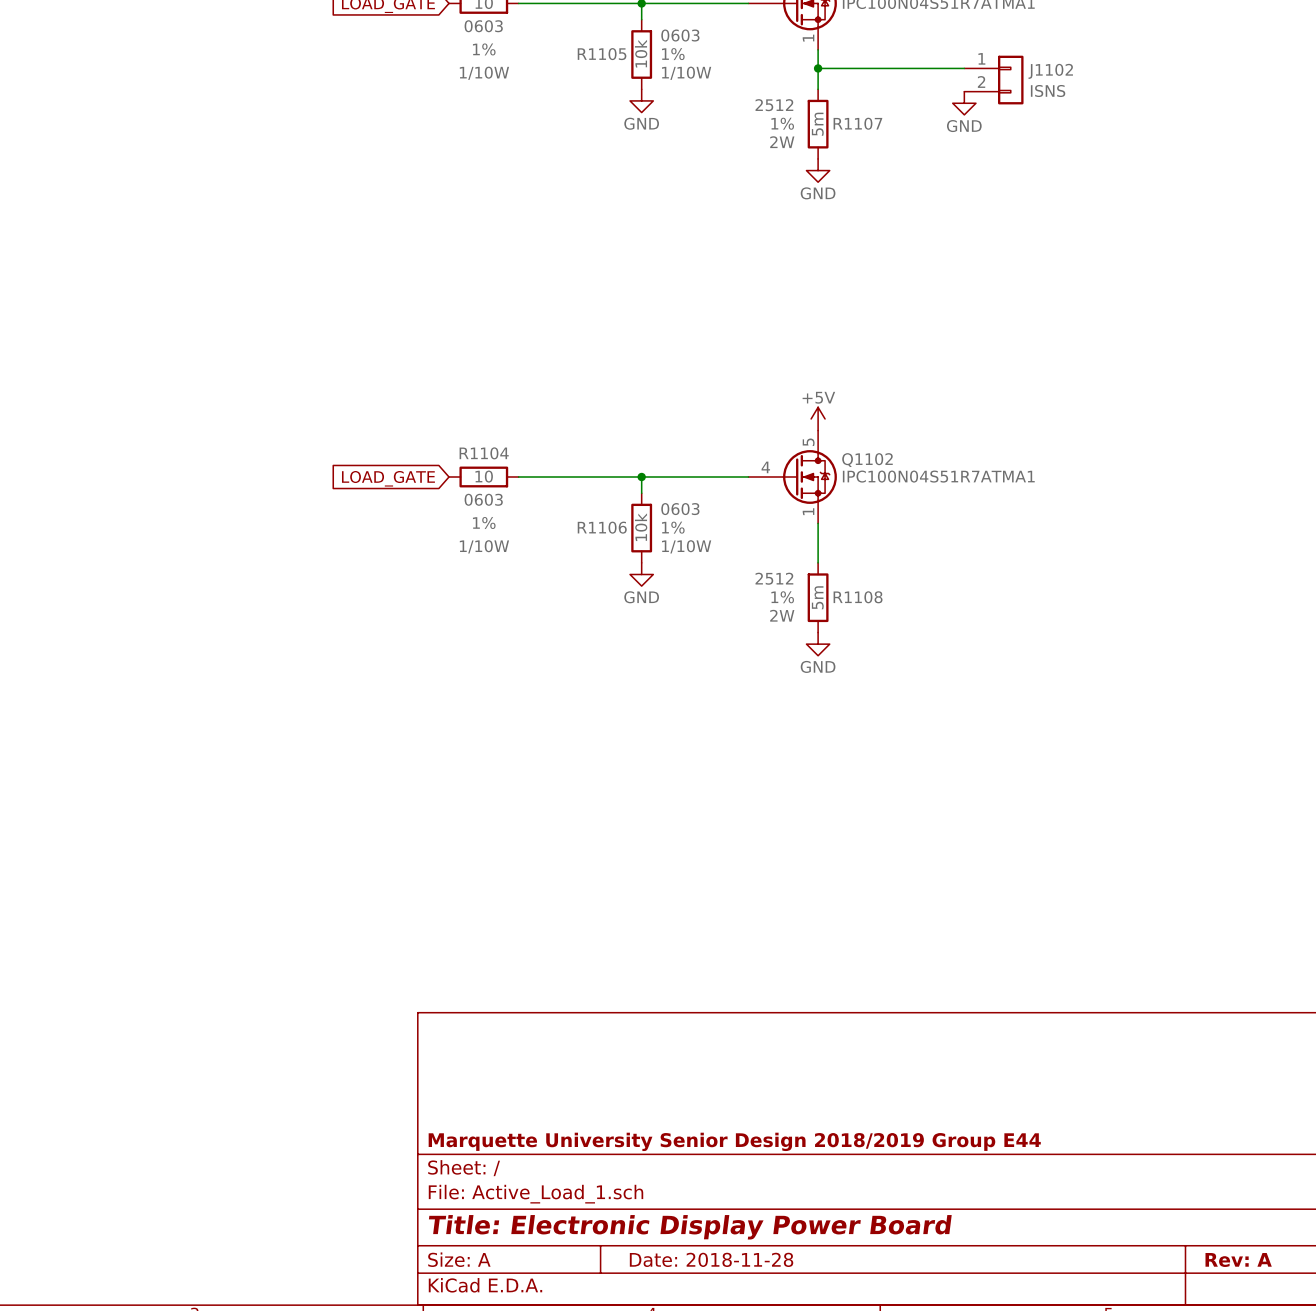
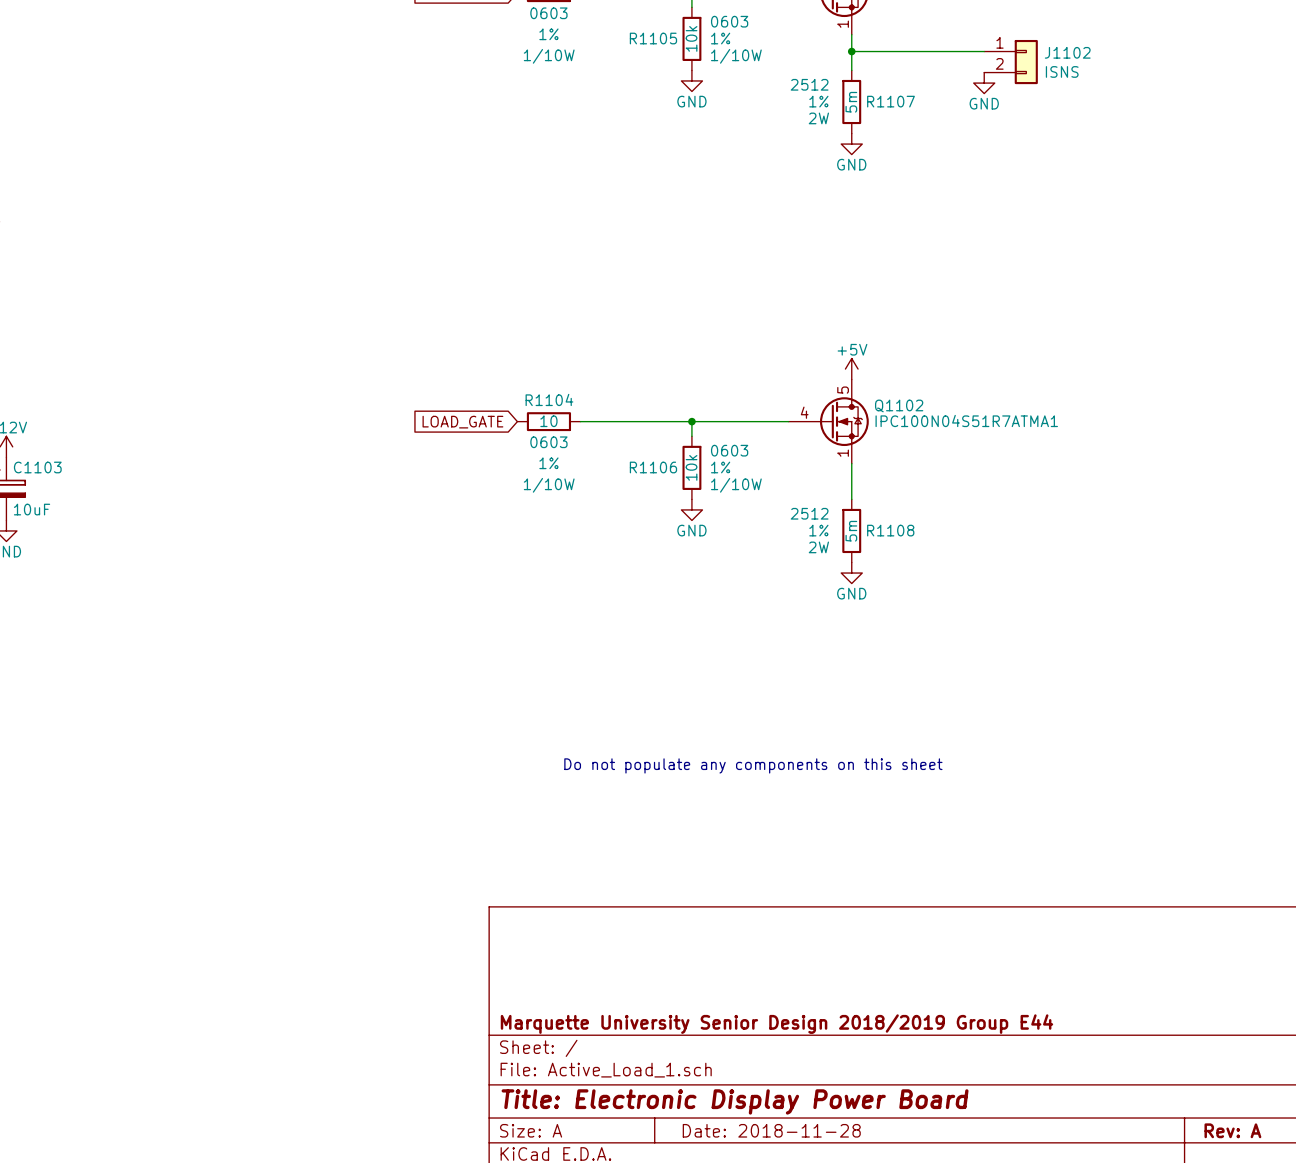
text: none -> Do not populate any components on this sheet (753, 765)

